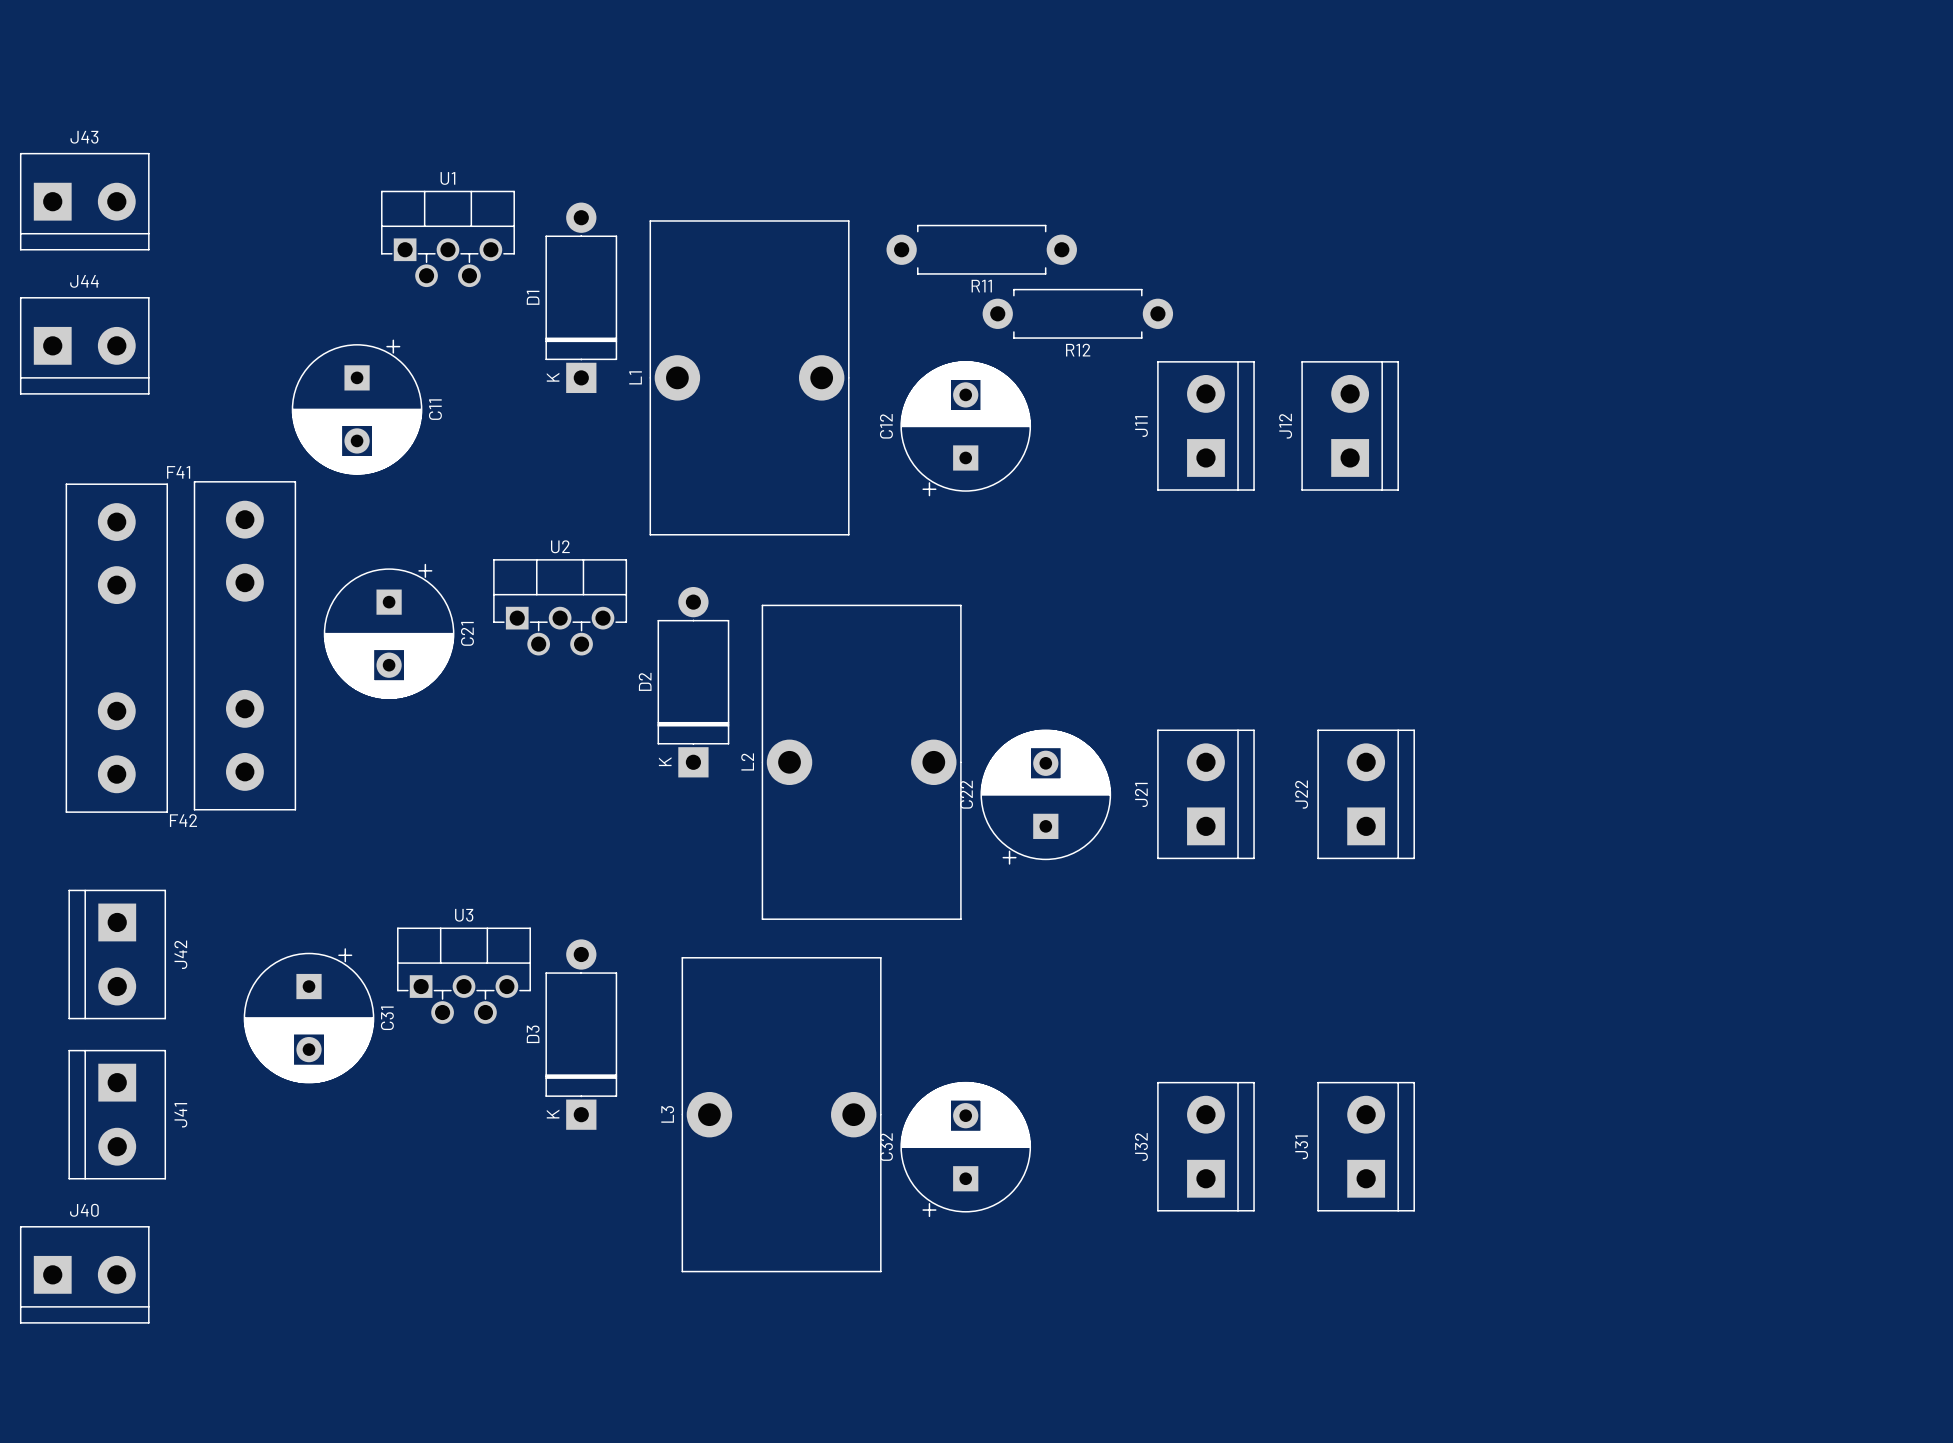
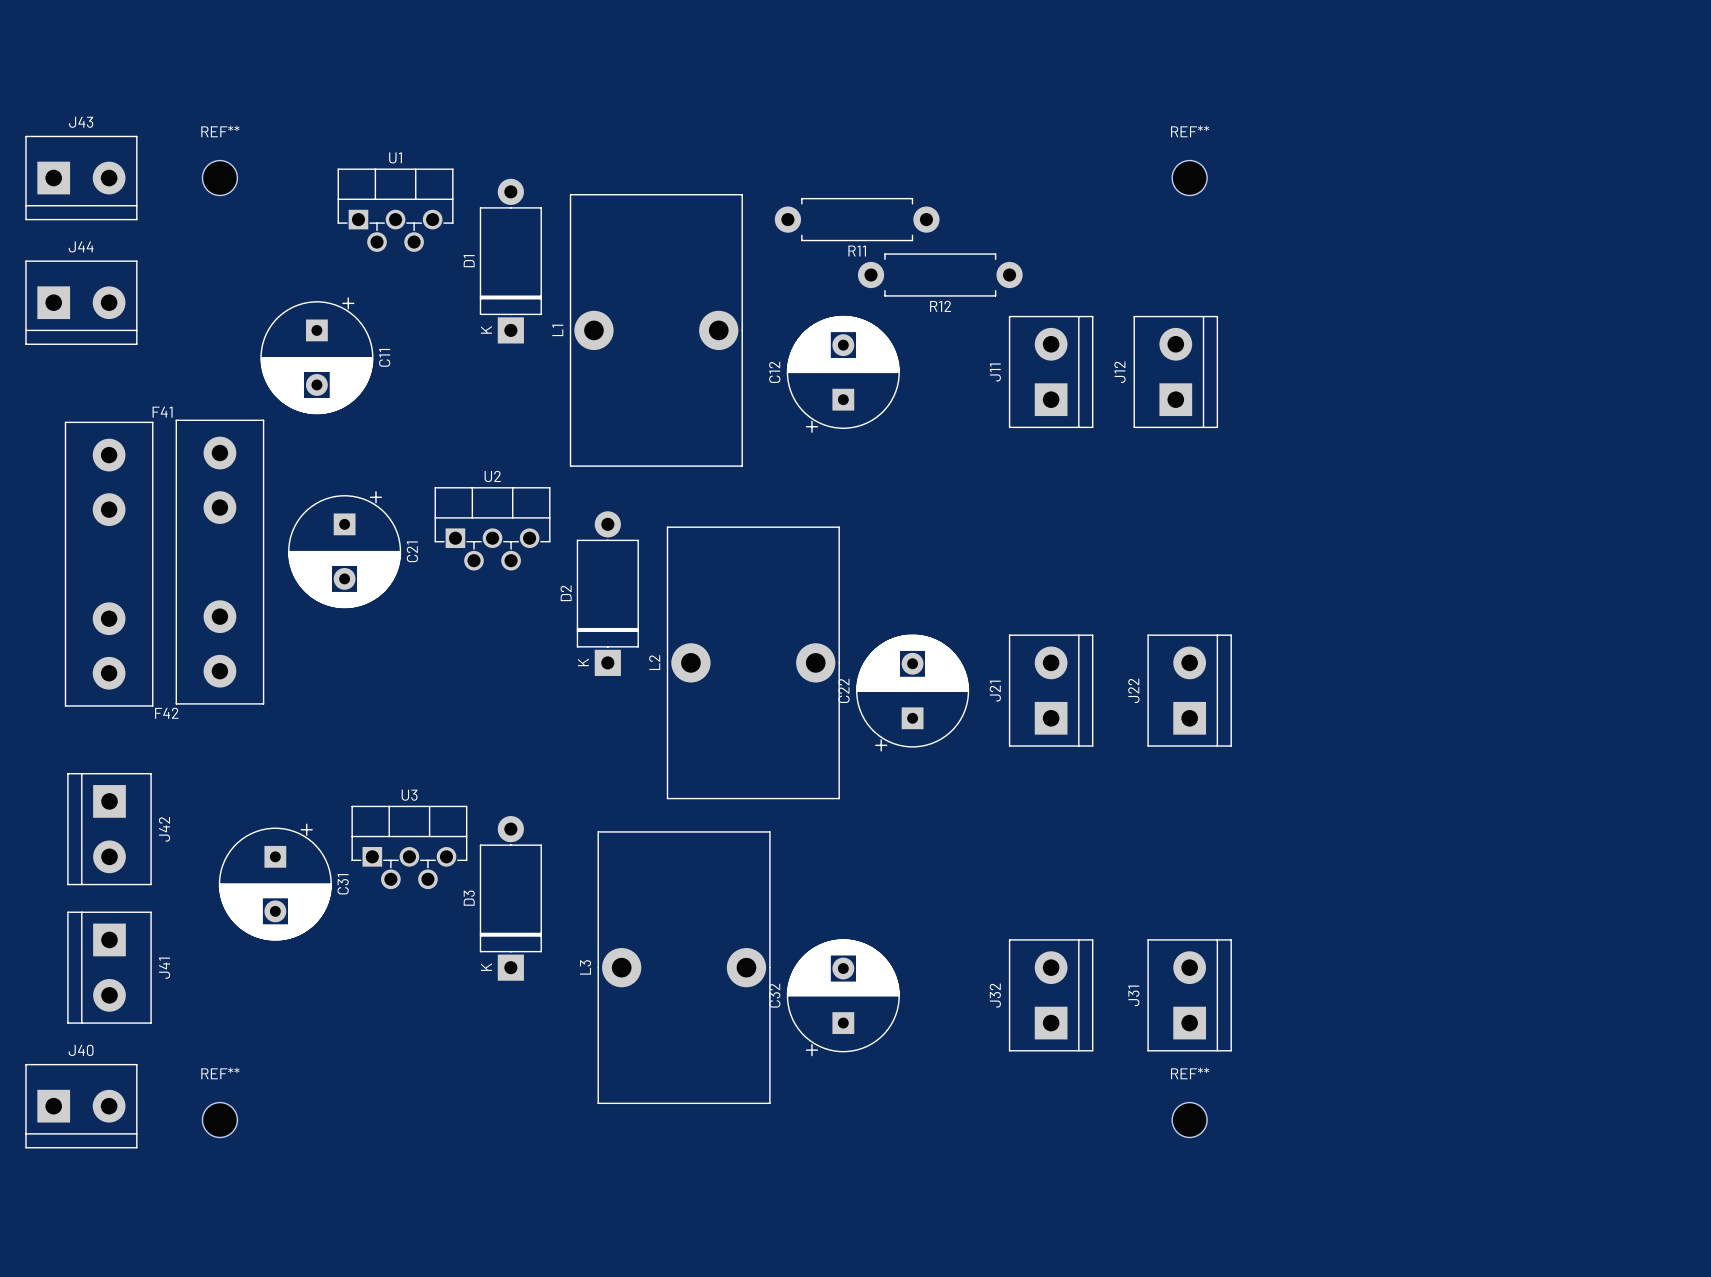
REF**: none -> (219, 178)
REF**: none -> (1189, 178)
REF**: none -> (219, 1120)
REF**: none -> (1189, 1120)

